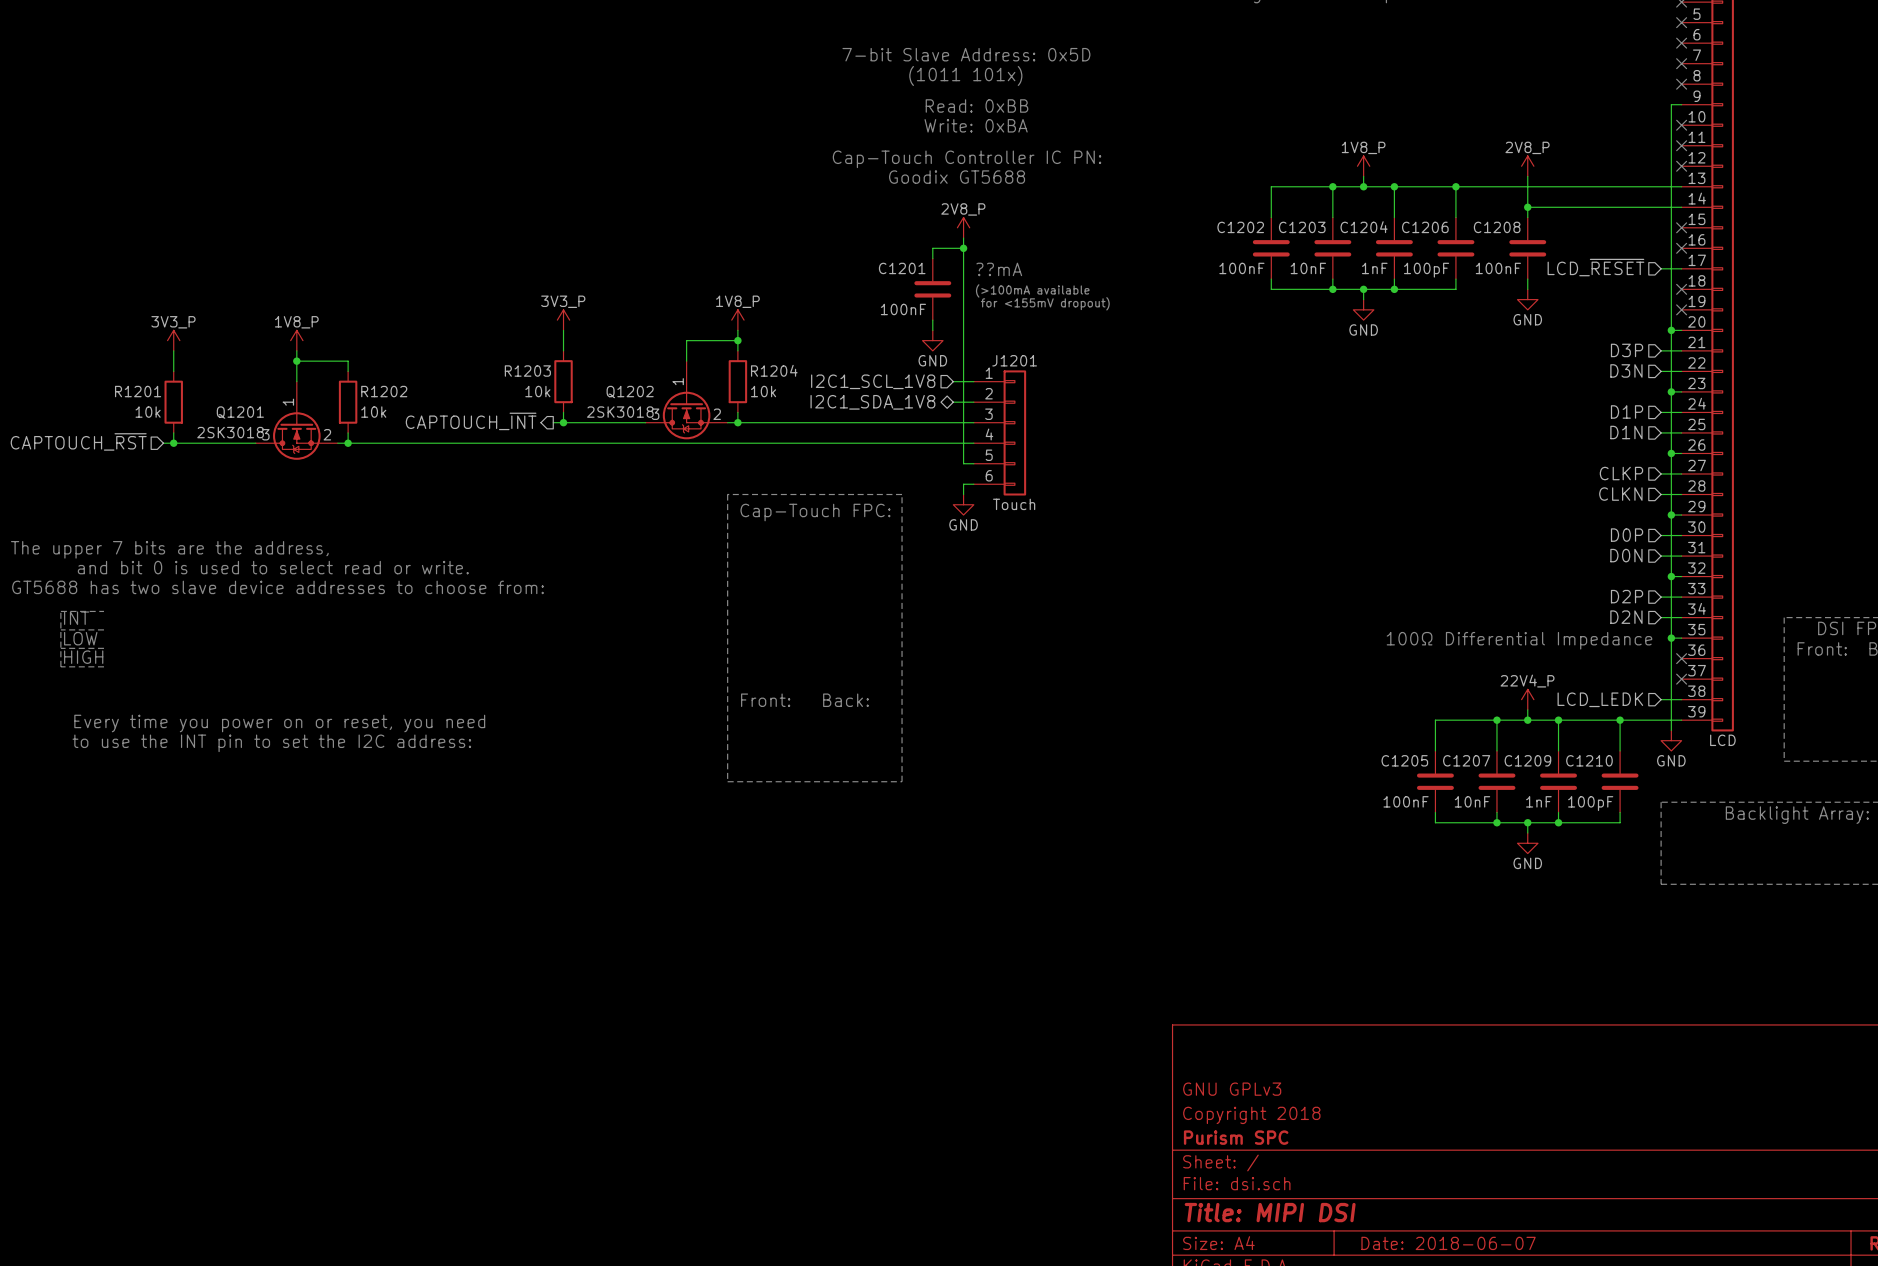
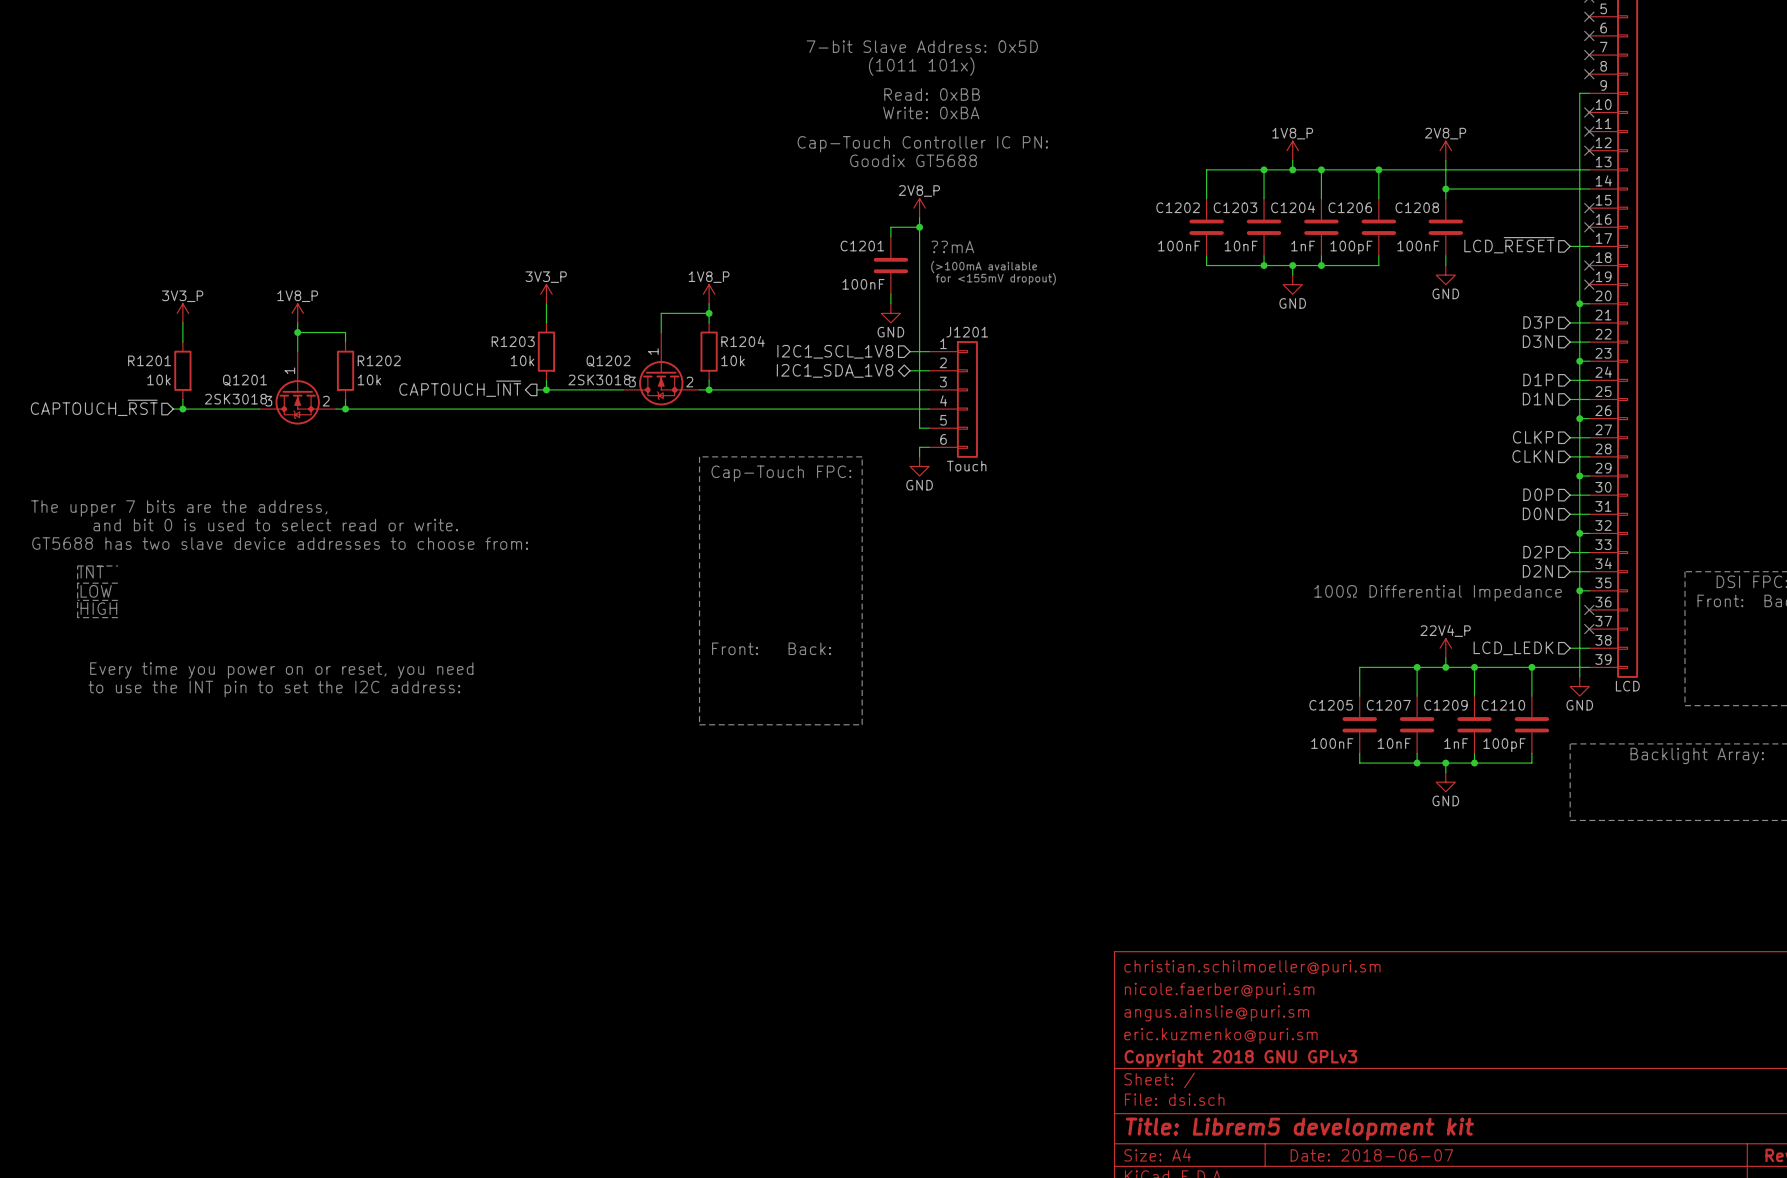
title block: none -> christian.schilmoeller@puri.sm (1252, 968)
title block: none -> nicole.faerber@puri.sm (1219, 990)
title block: GNU GPLv3 (1232, 1089) -> angus.ainslie@puri.sm (1216, 1013)
title block: Copyright 2018 (1251, 1115) -> eric.kuzmenko@puri.sm (1220, 1036)
title block: Purism SPC (1236, 1137) -> Copyright 2018 GNU GPLv3 (1240, 1058)
title block: Title: MIPI DSI (1270, 1212) -> Title: Librem5 development kit (1299, 1129)

